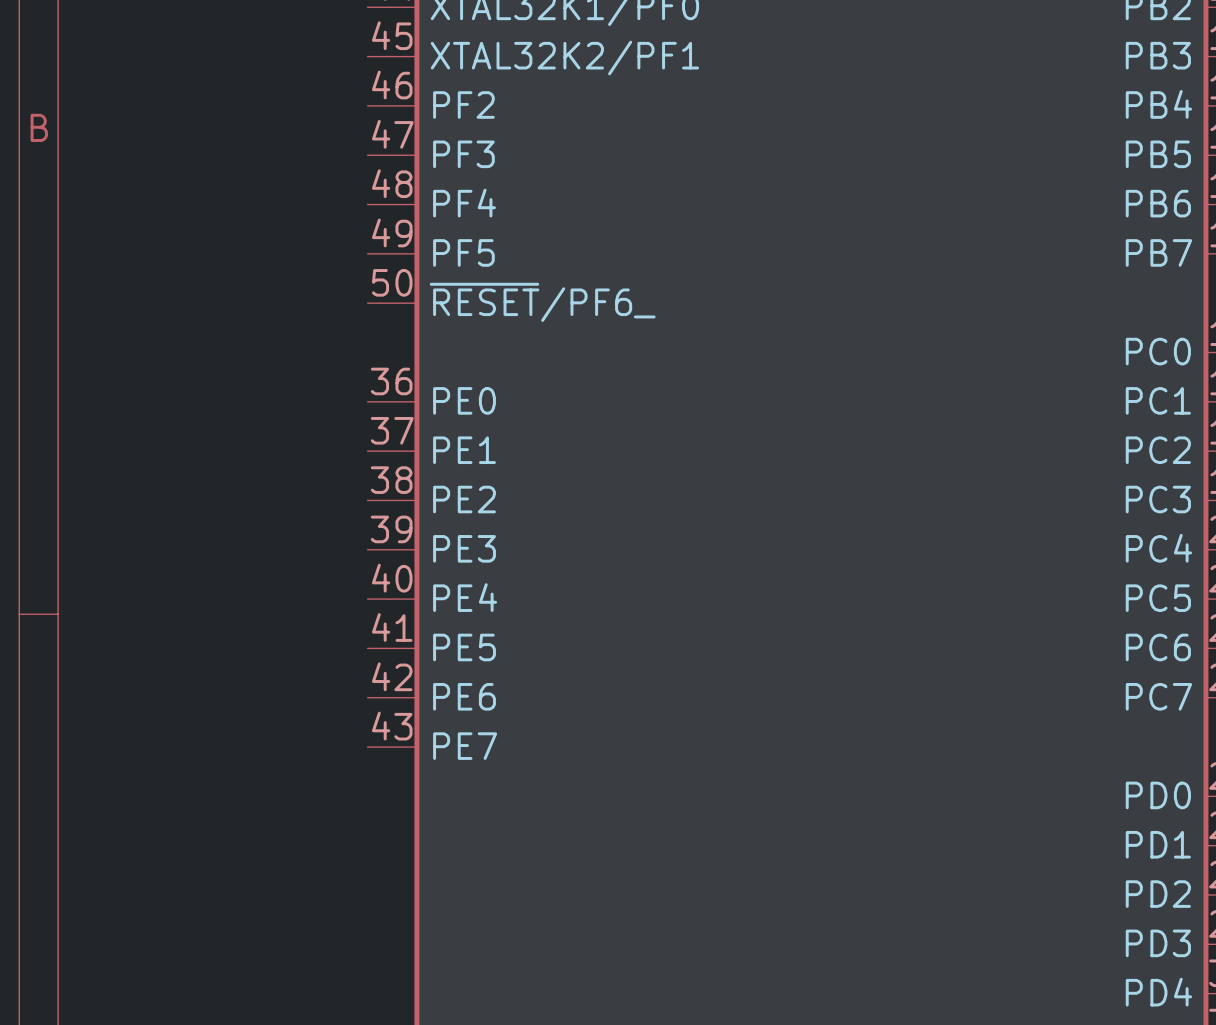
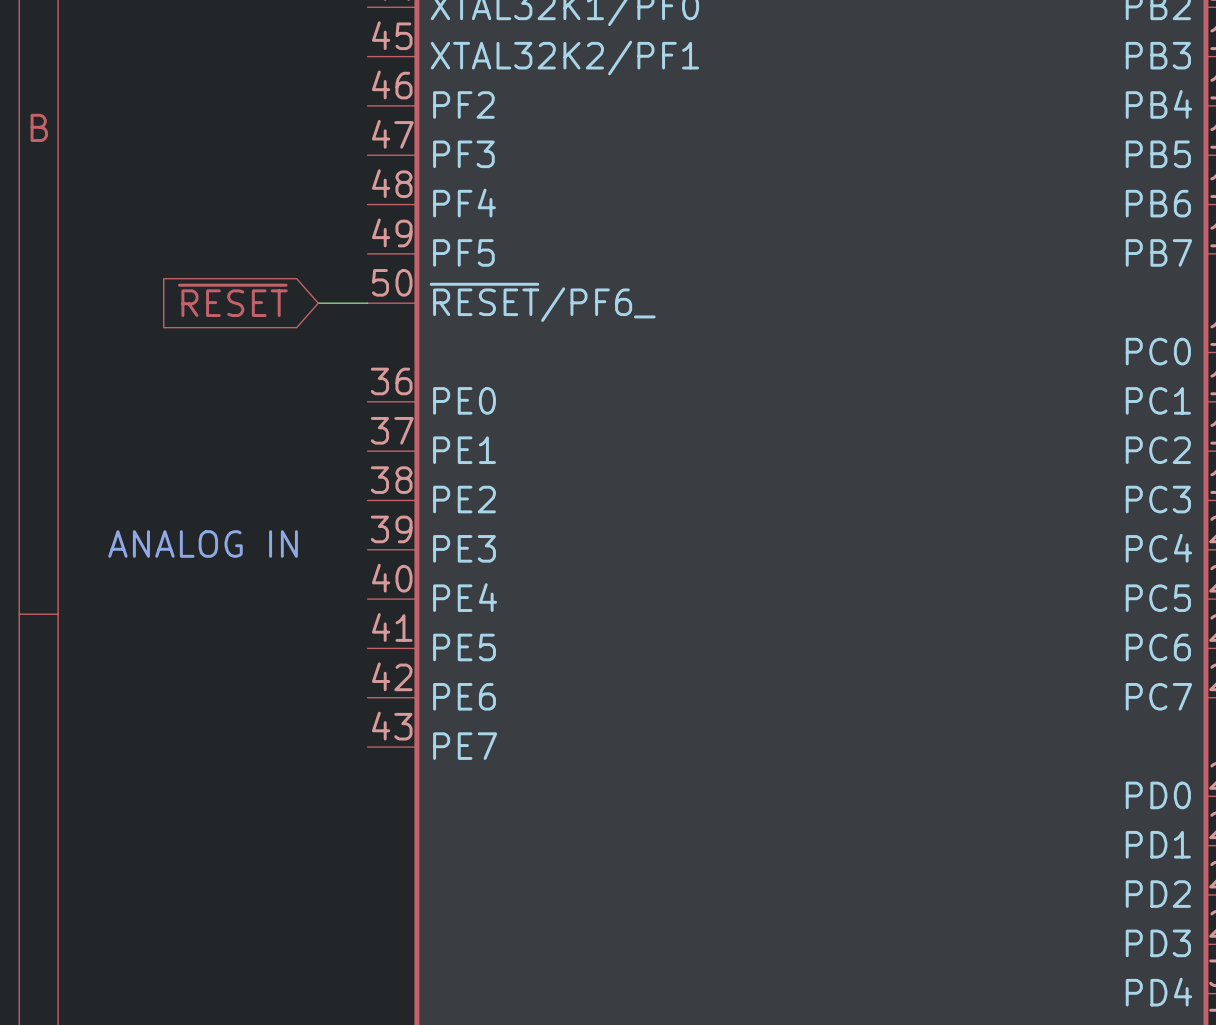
global label: none -> ~{RESET} (232, 300)
wire: none -> (318, 303) (367, 303)
text: none -> ANALOG IN (203, 543)

